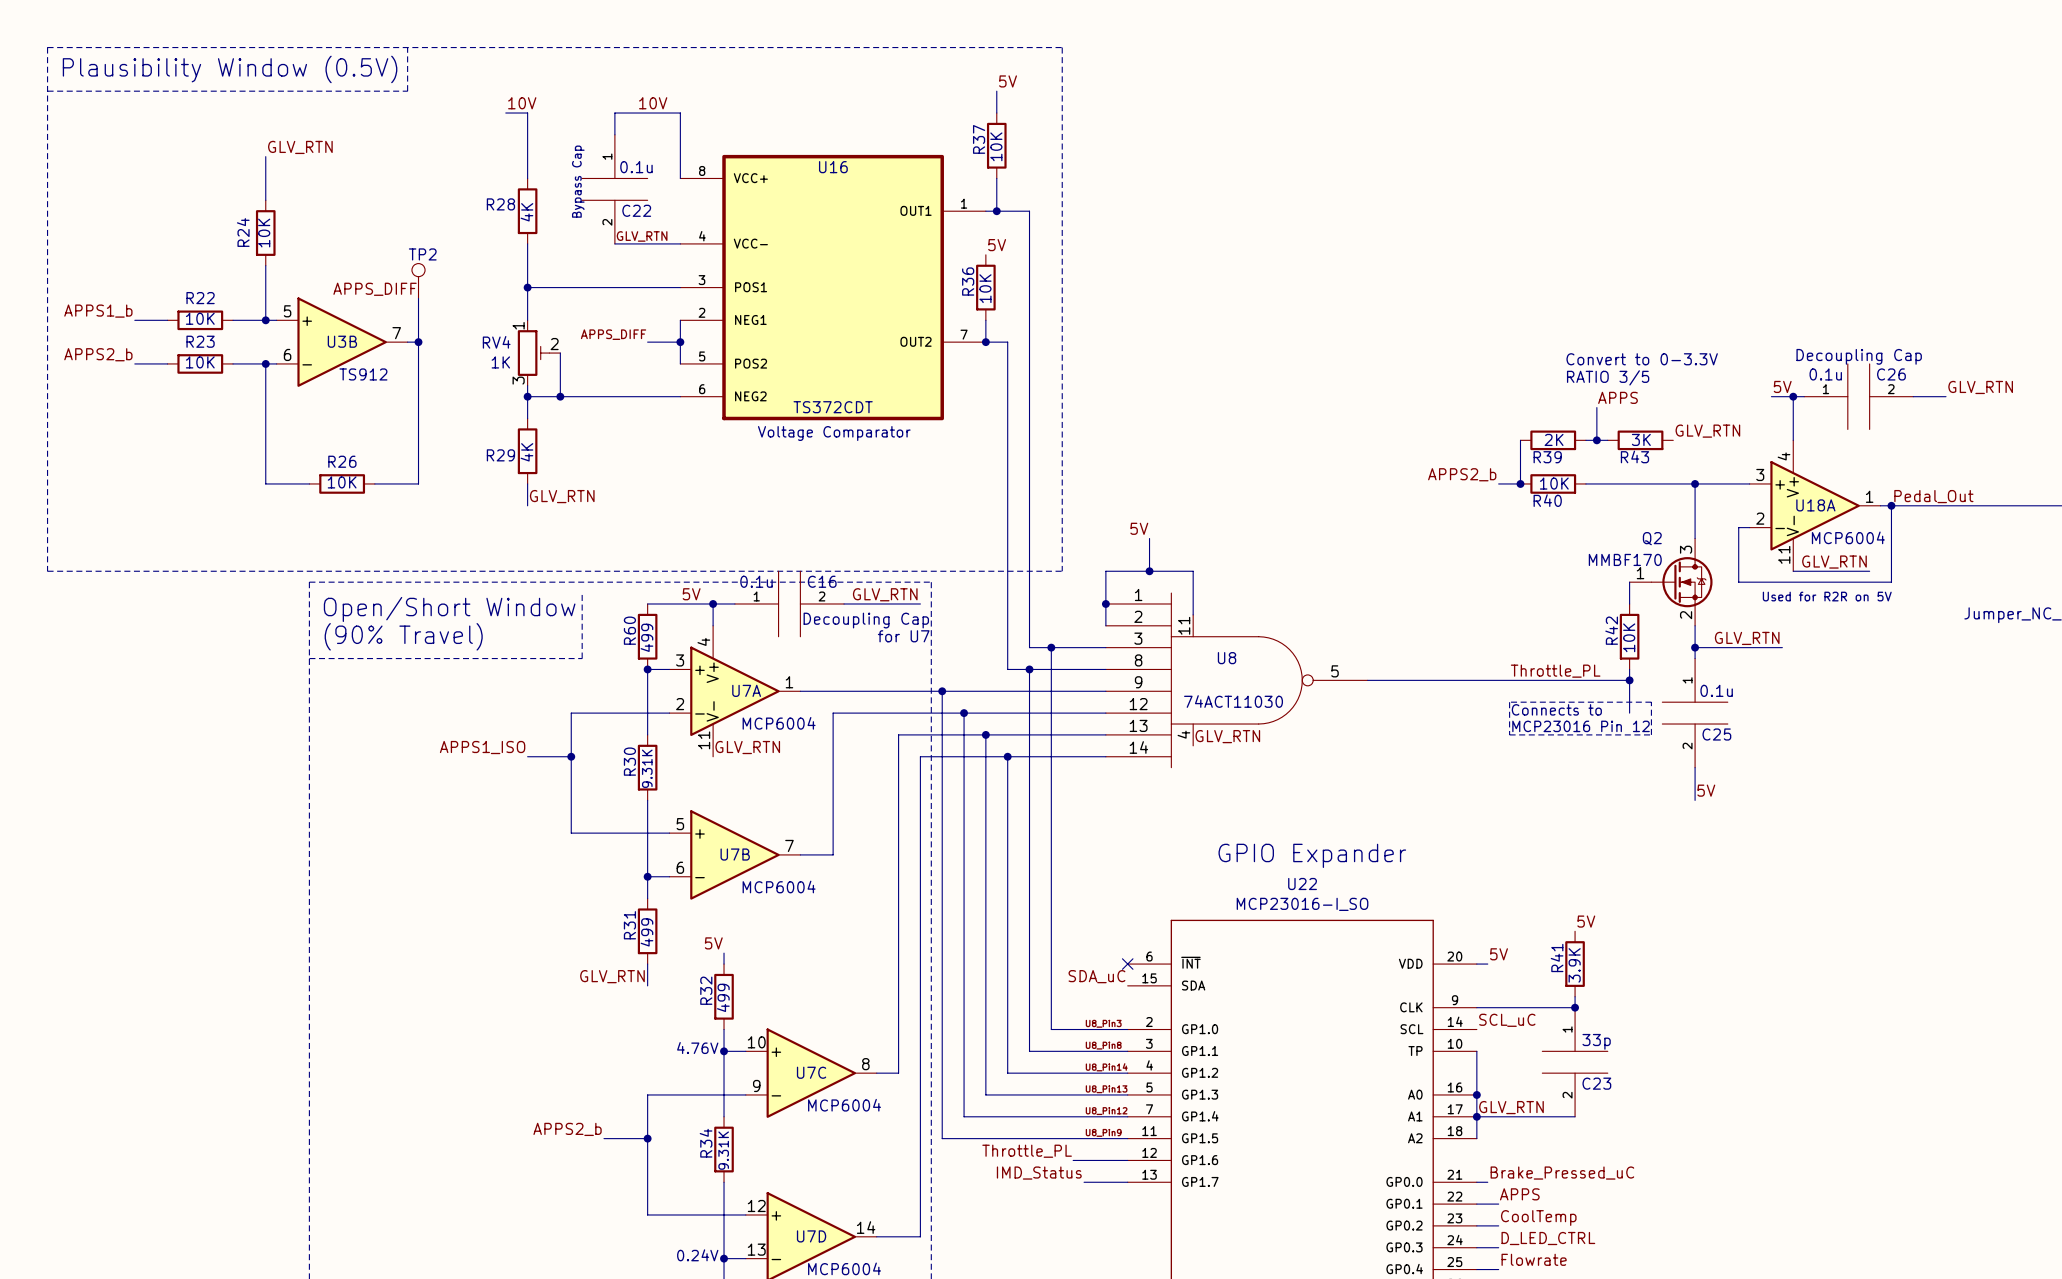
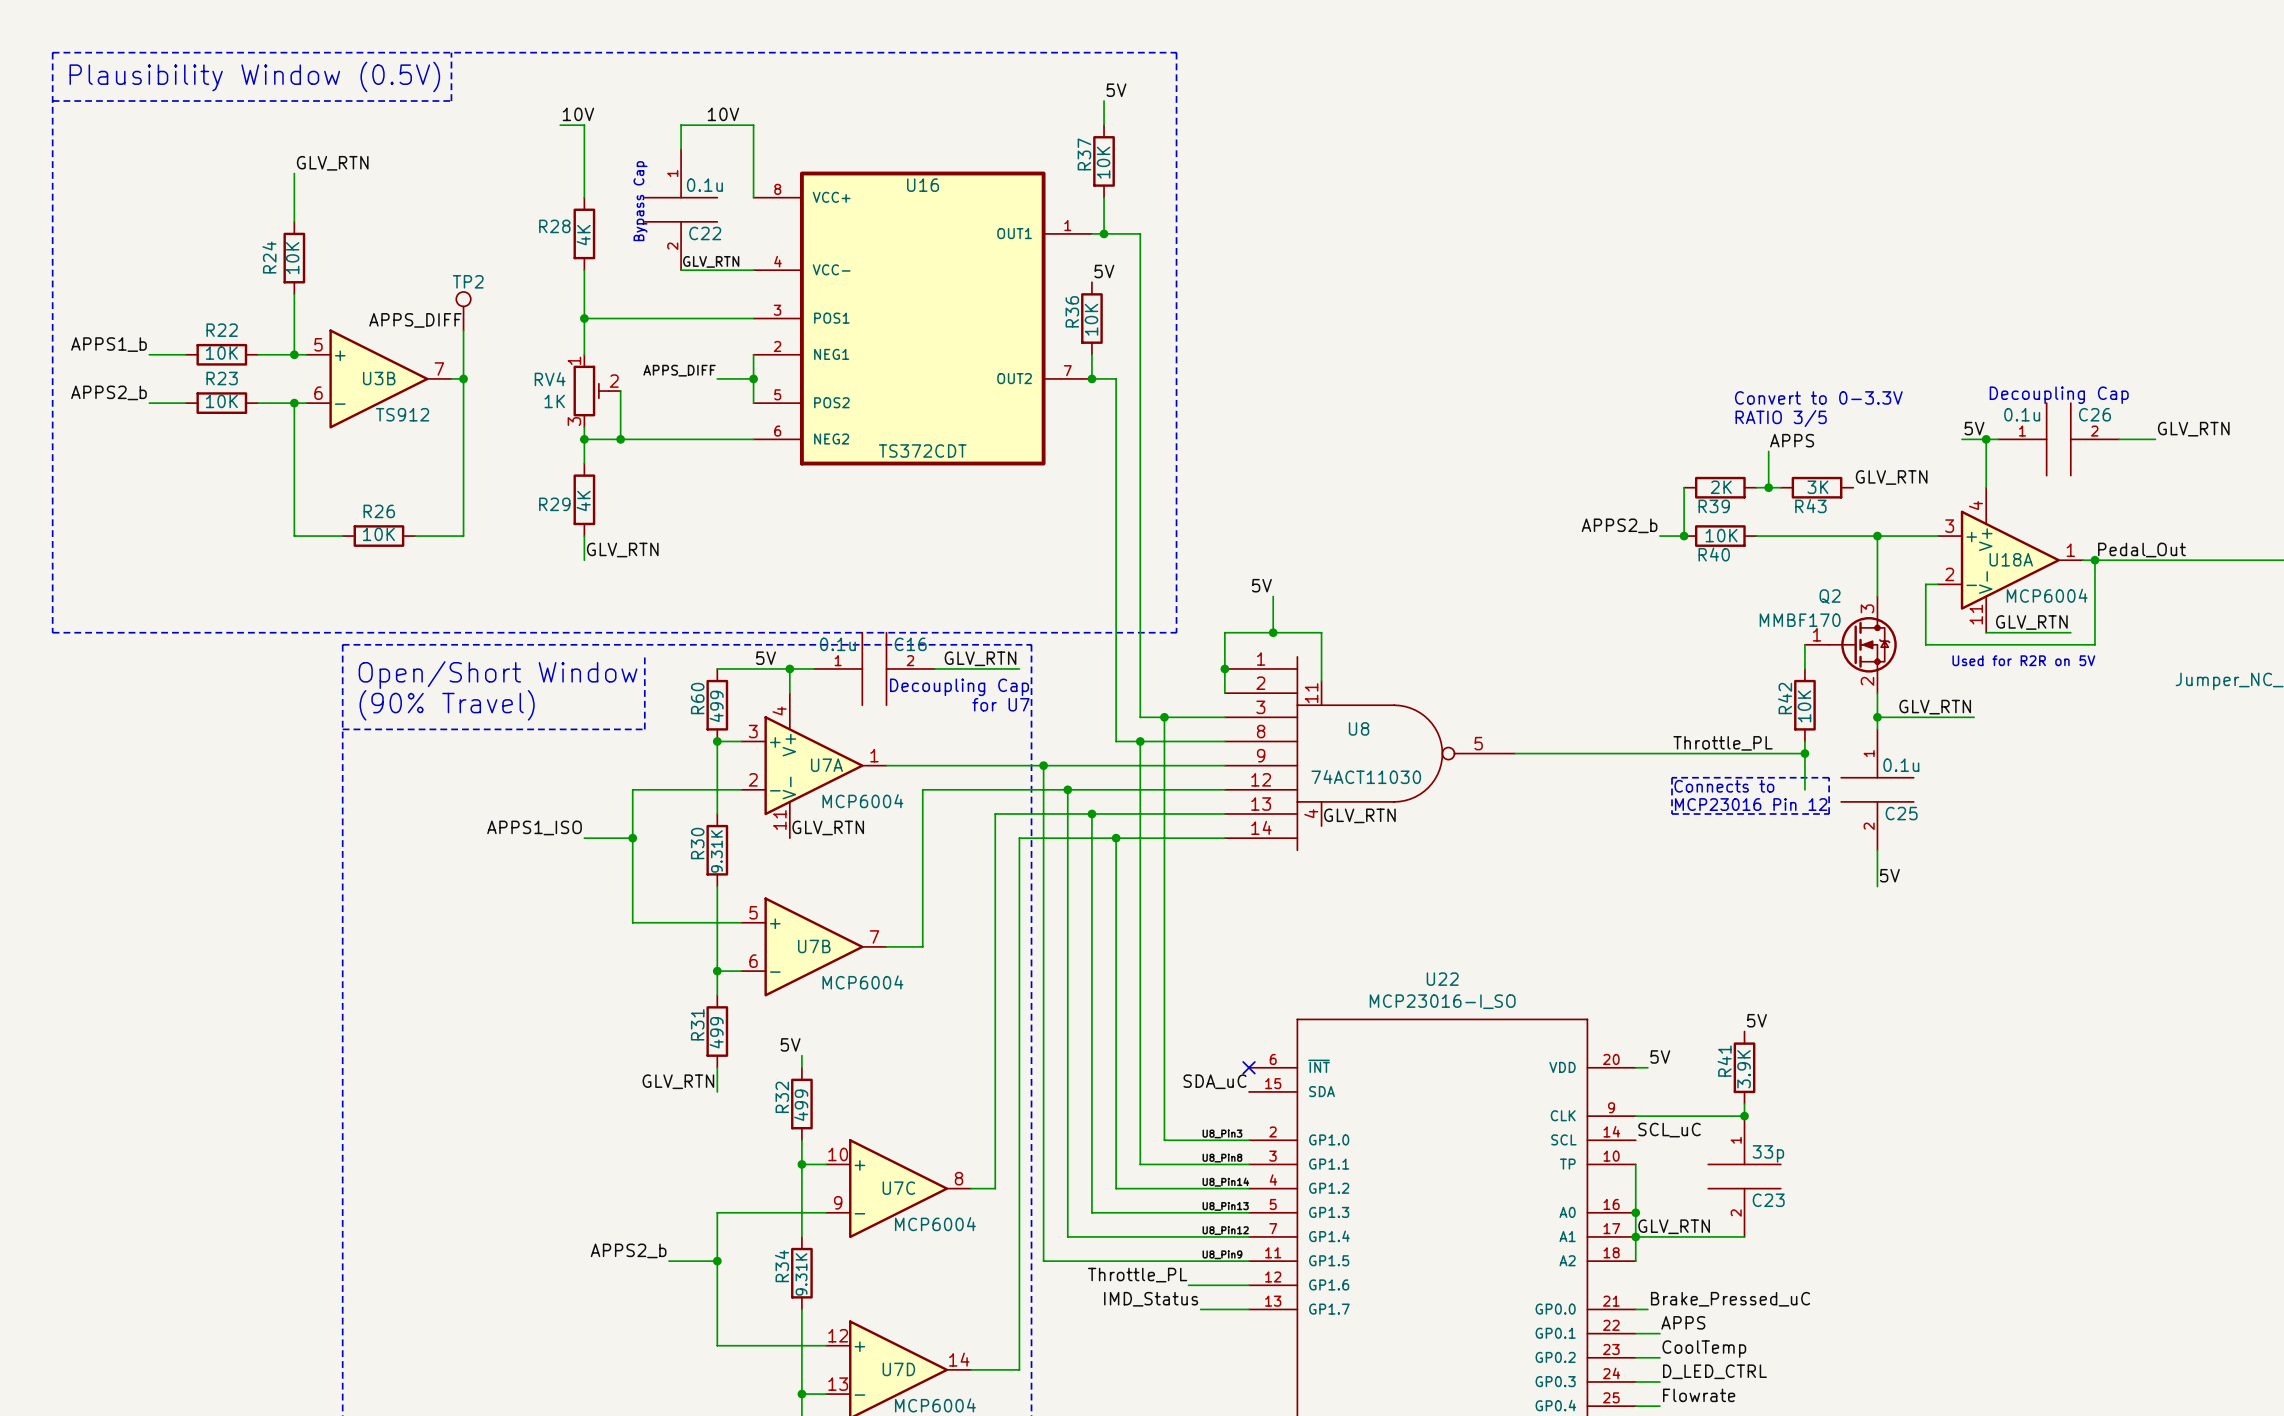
text: Voltage Comparator (834, 433) -> none
text: GPIO Expander (1312, 855) -> none
text: 4.76V (697, 1048) -> none
text: 0.24V (697, 1255) -> none

